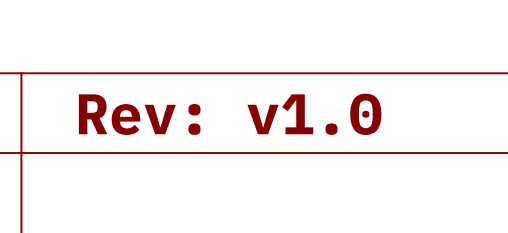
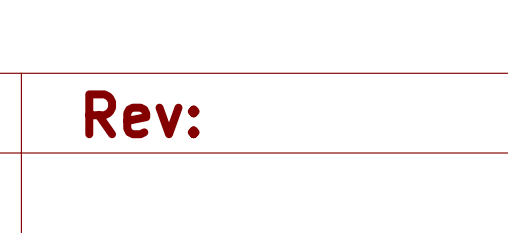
title block: Rev: v1.0 (230, 114) -> Rev: (142, 114)

